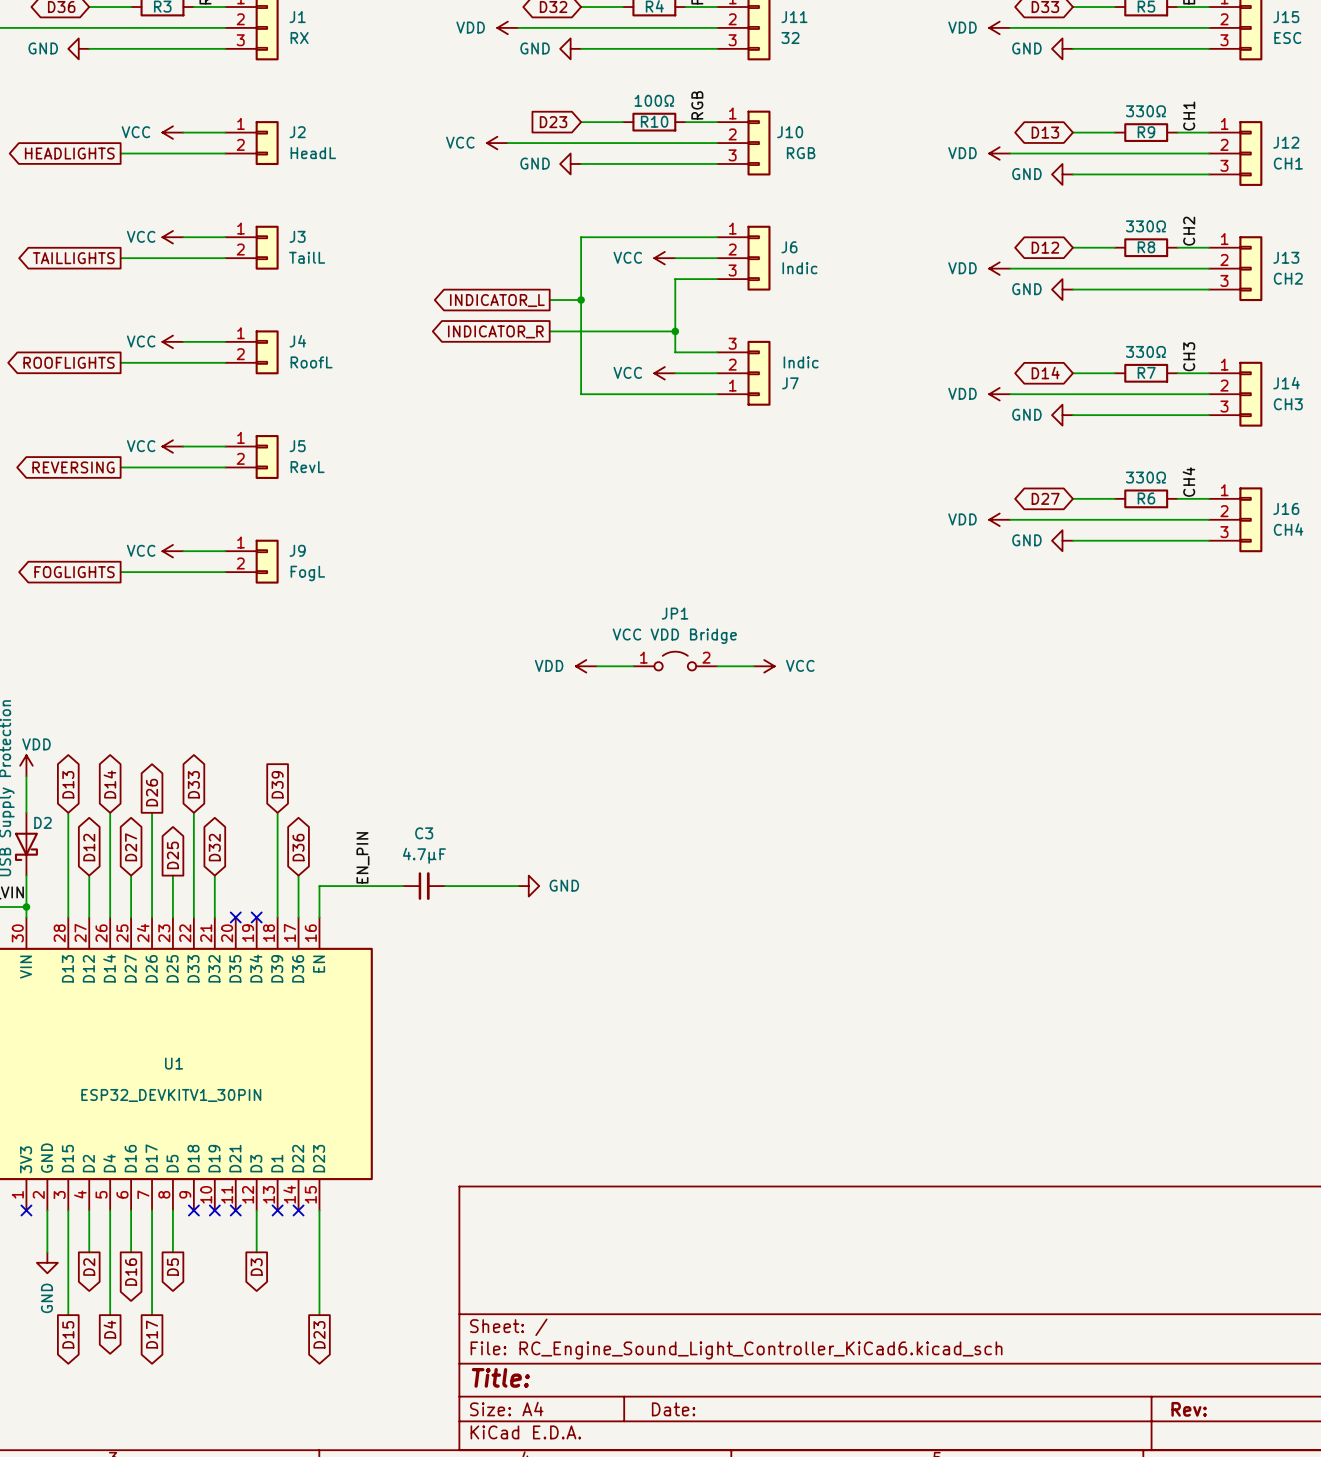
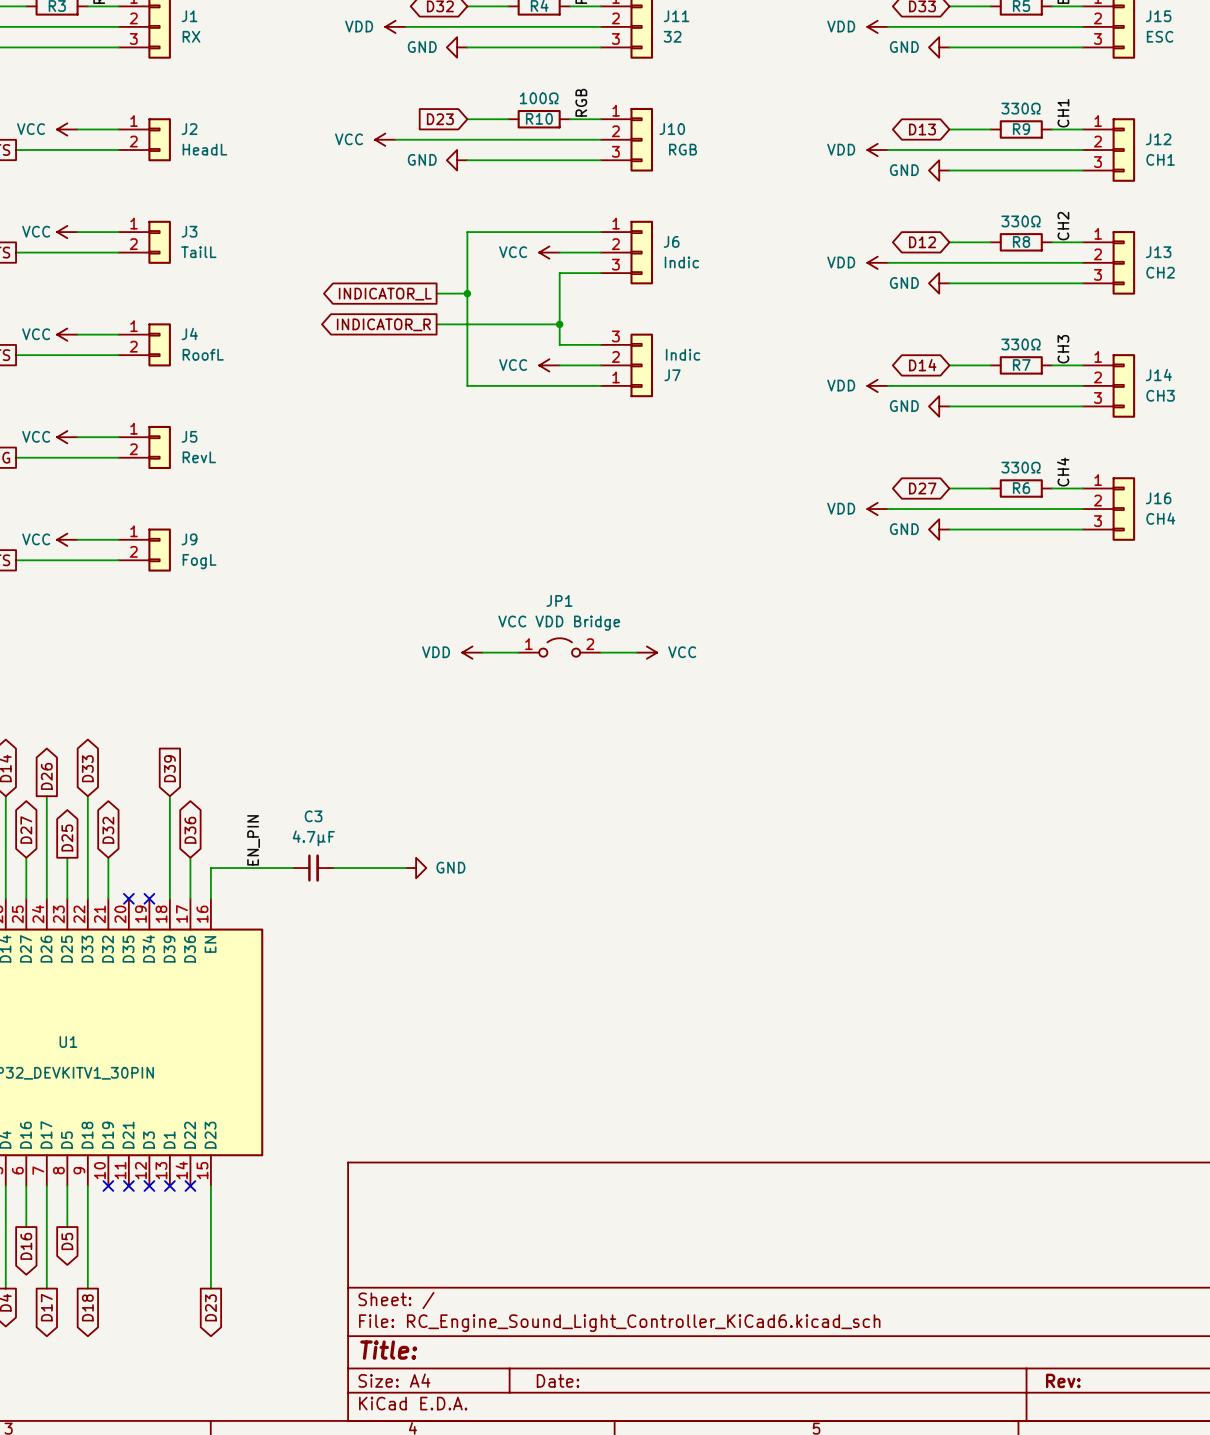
wire: none -> (87, 1186) (87, 1288)
no-connect mark: (193, 1210) -> none
wire: (256, 1210) (256, 1252) -> none
no-connect mark: none -> (149, 1186)
global label: D3 (256, 1267) -> none
global label: none -> D18 (87, 1307)

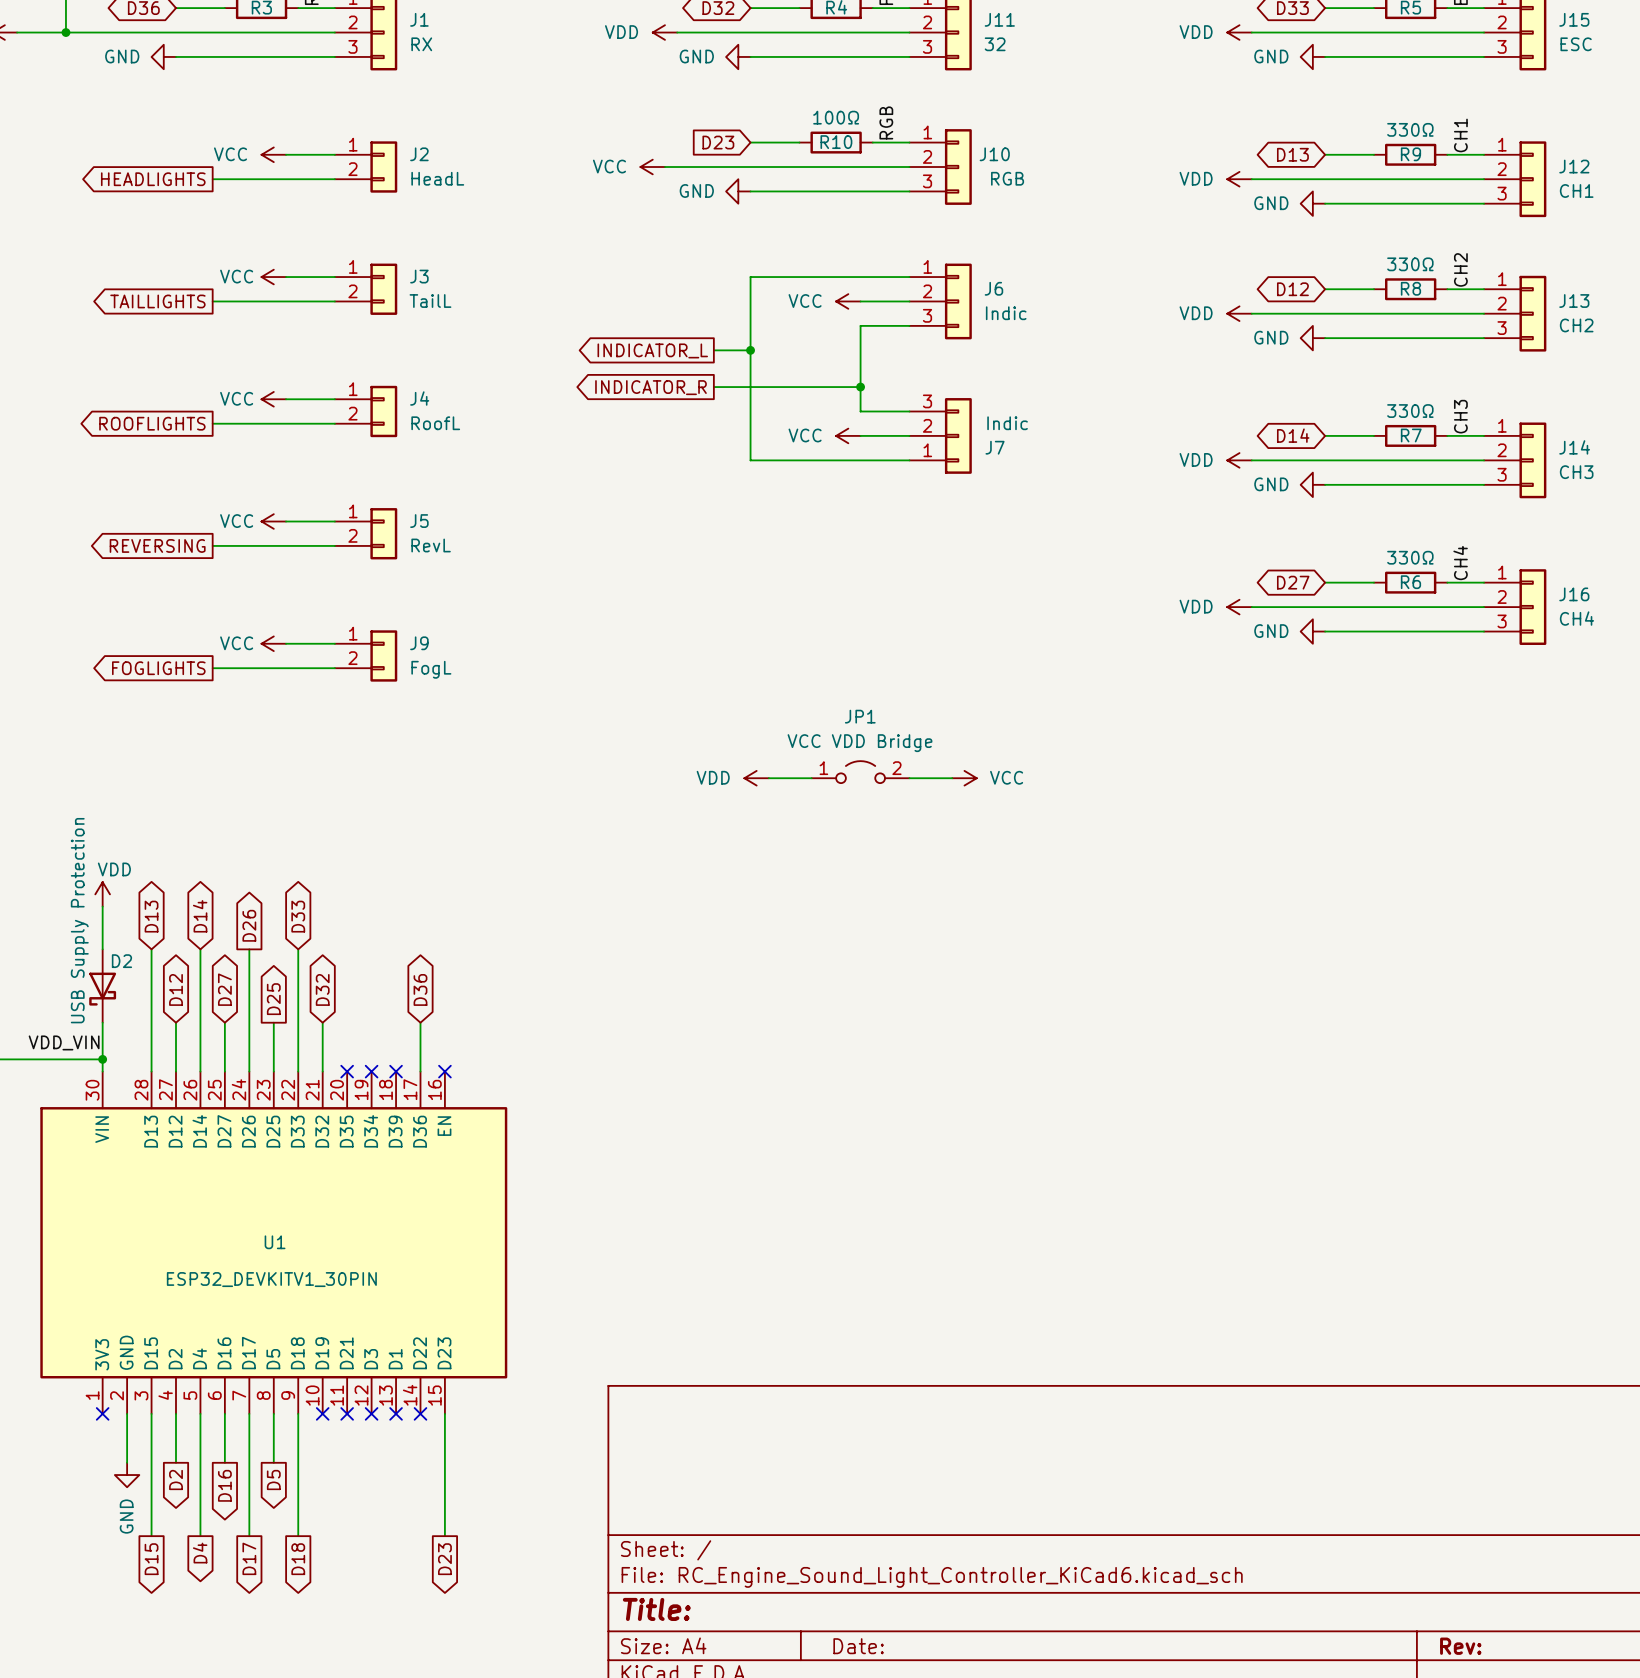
global label: D39 (169, 768) -> none
wire: (169, 796) (169, 898) -> none
label: EN_PIN (253, 840) -> none
wire: (293, 868) (210, 868) (210, 898) -> none
C3: 4.7µF (313, 868) -> none
wire: (334, 868) (405, 868) -> none
power symbol: GND (416, 868) -> none
no-connect mark: none -> (396, 1071)
no-connect mark: none -> (444, 1071)

